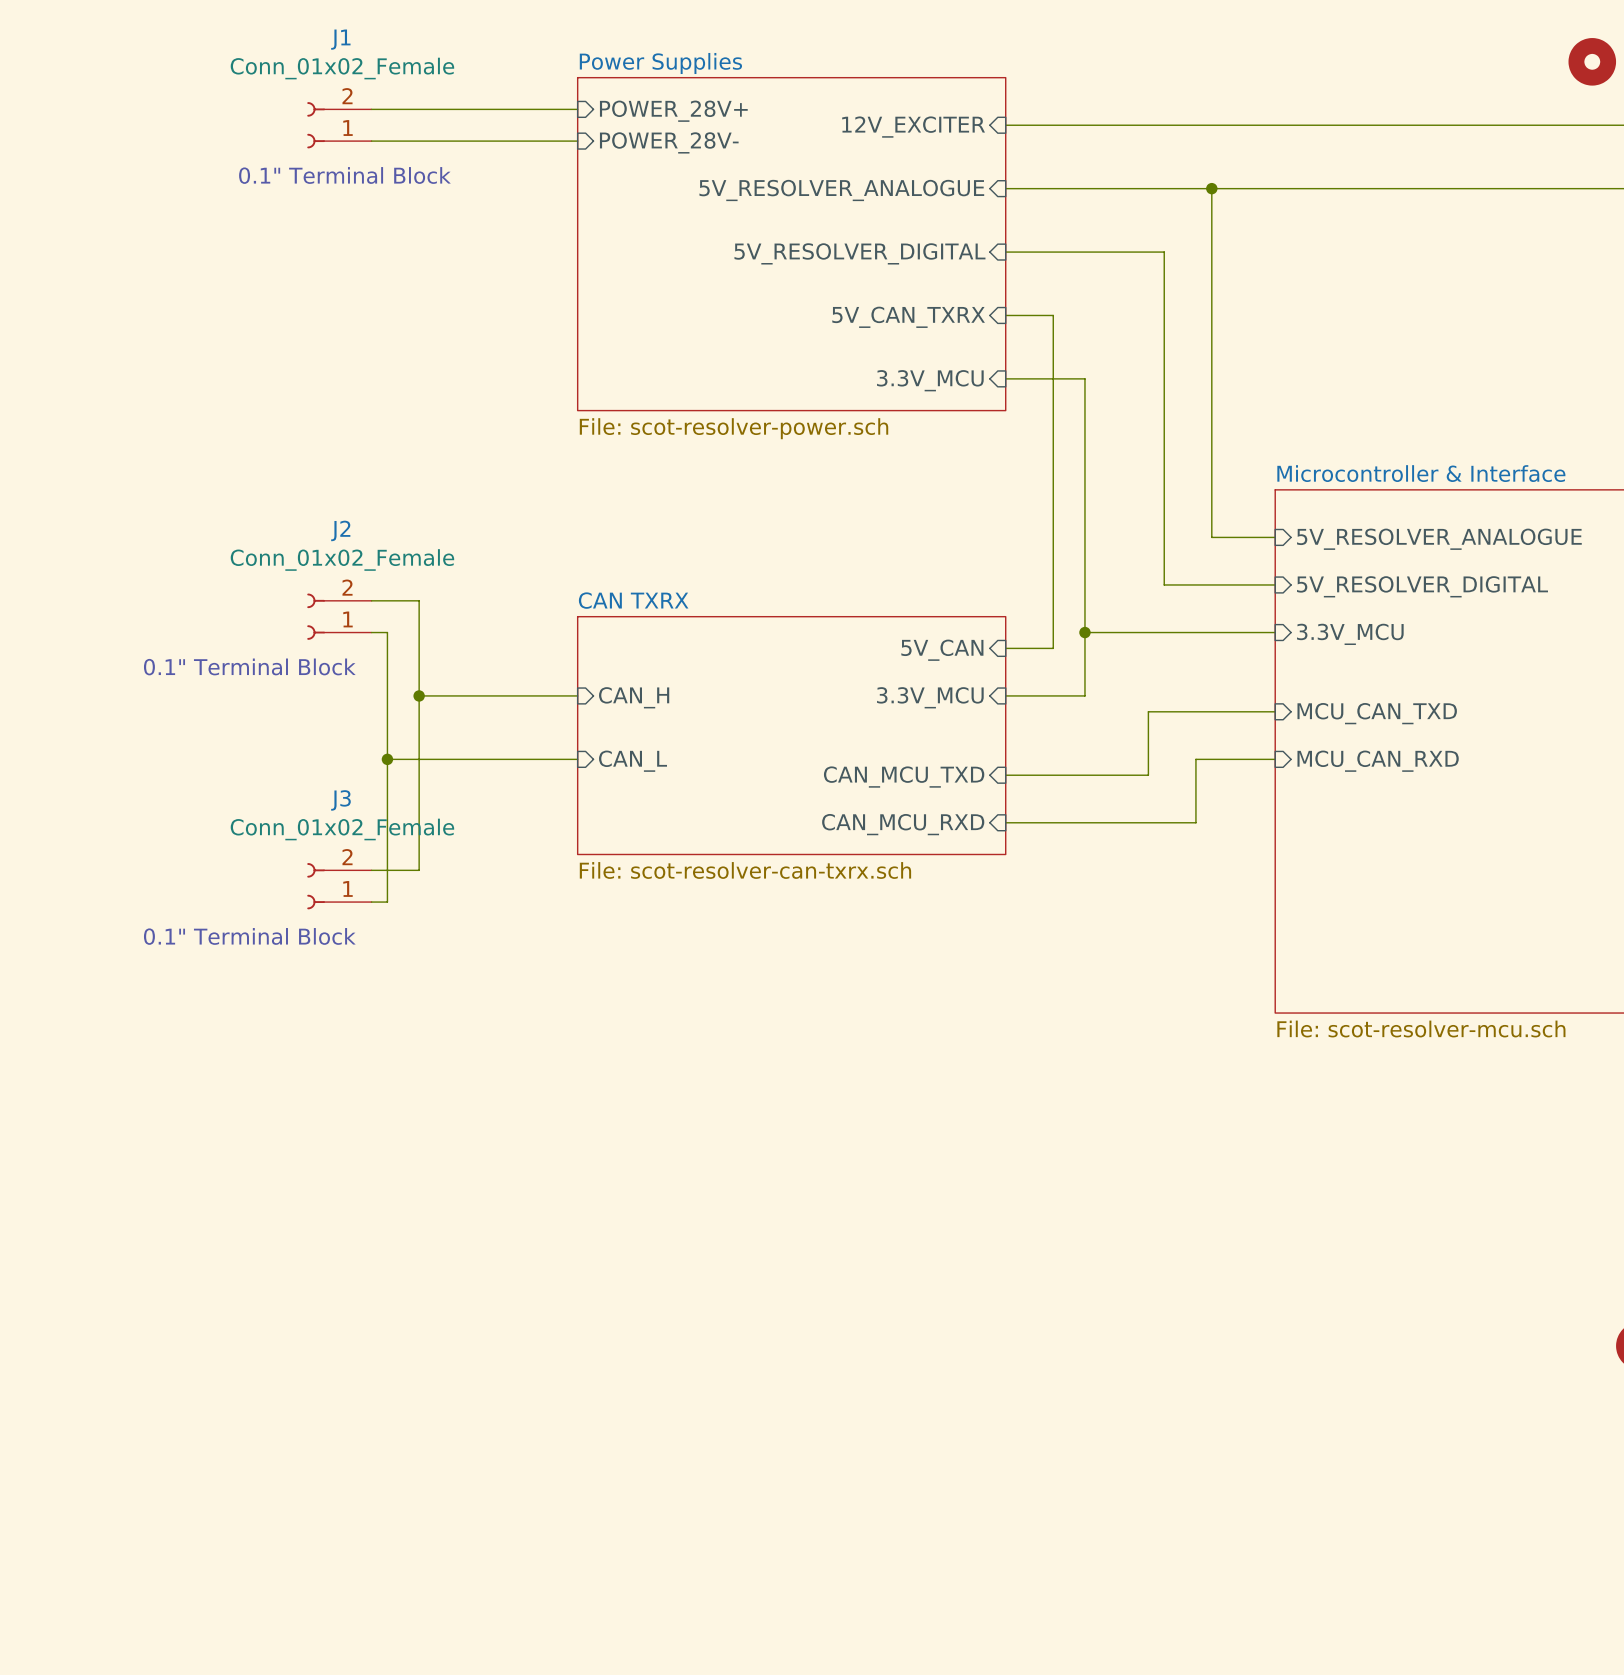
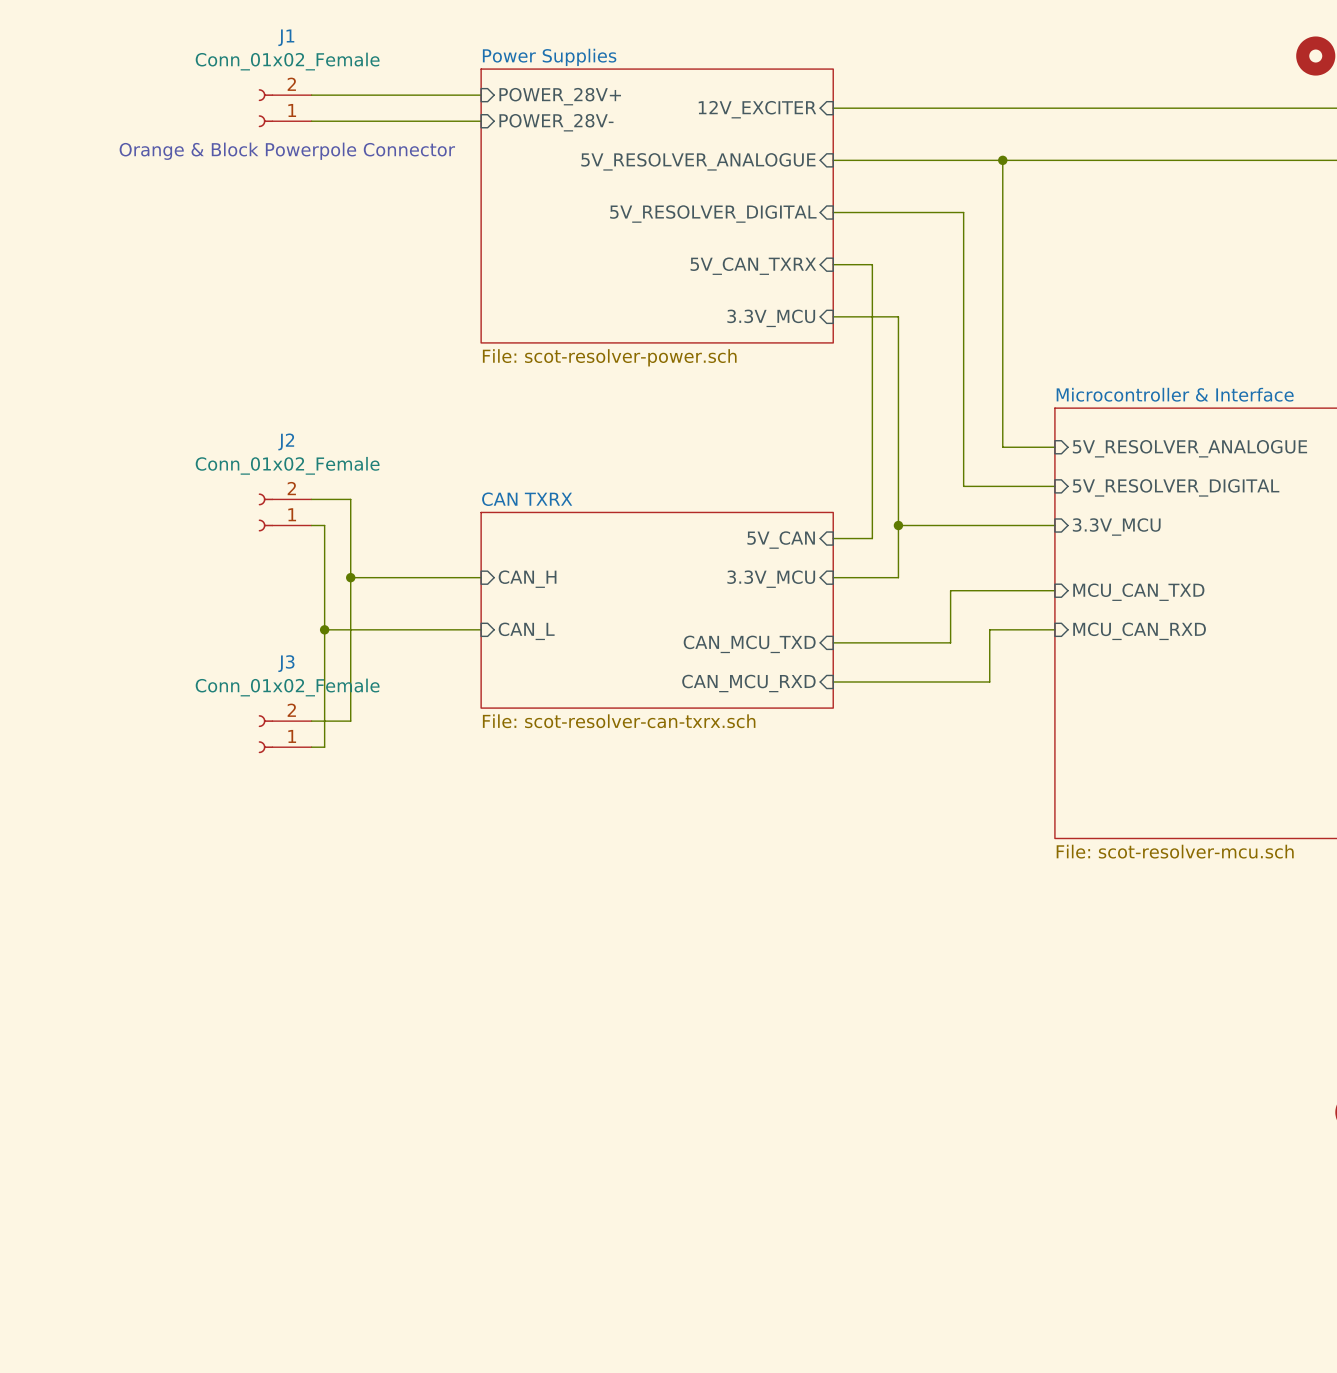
text: 0.1" Terminal Block (344, 175) -> none
text: none -> Orange & Block Powerpole Connector (287, 151)
text: 0.1" Terminal Block (249, 666) -> none
text: 0.1" Terminal Block (249, 936) -> none

